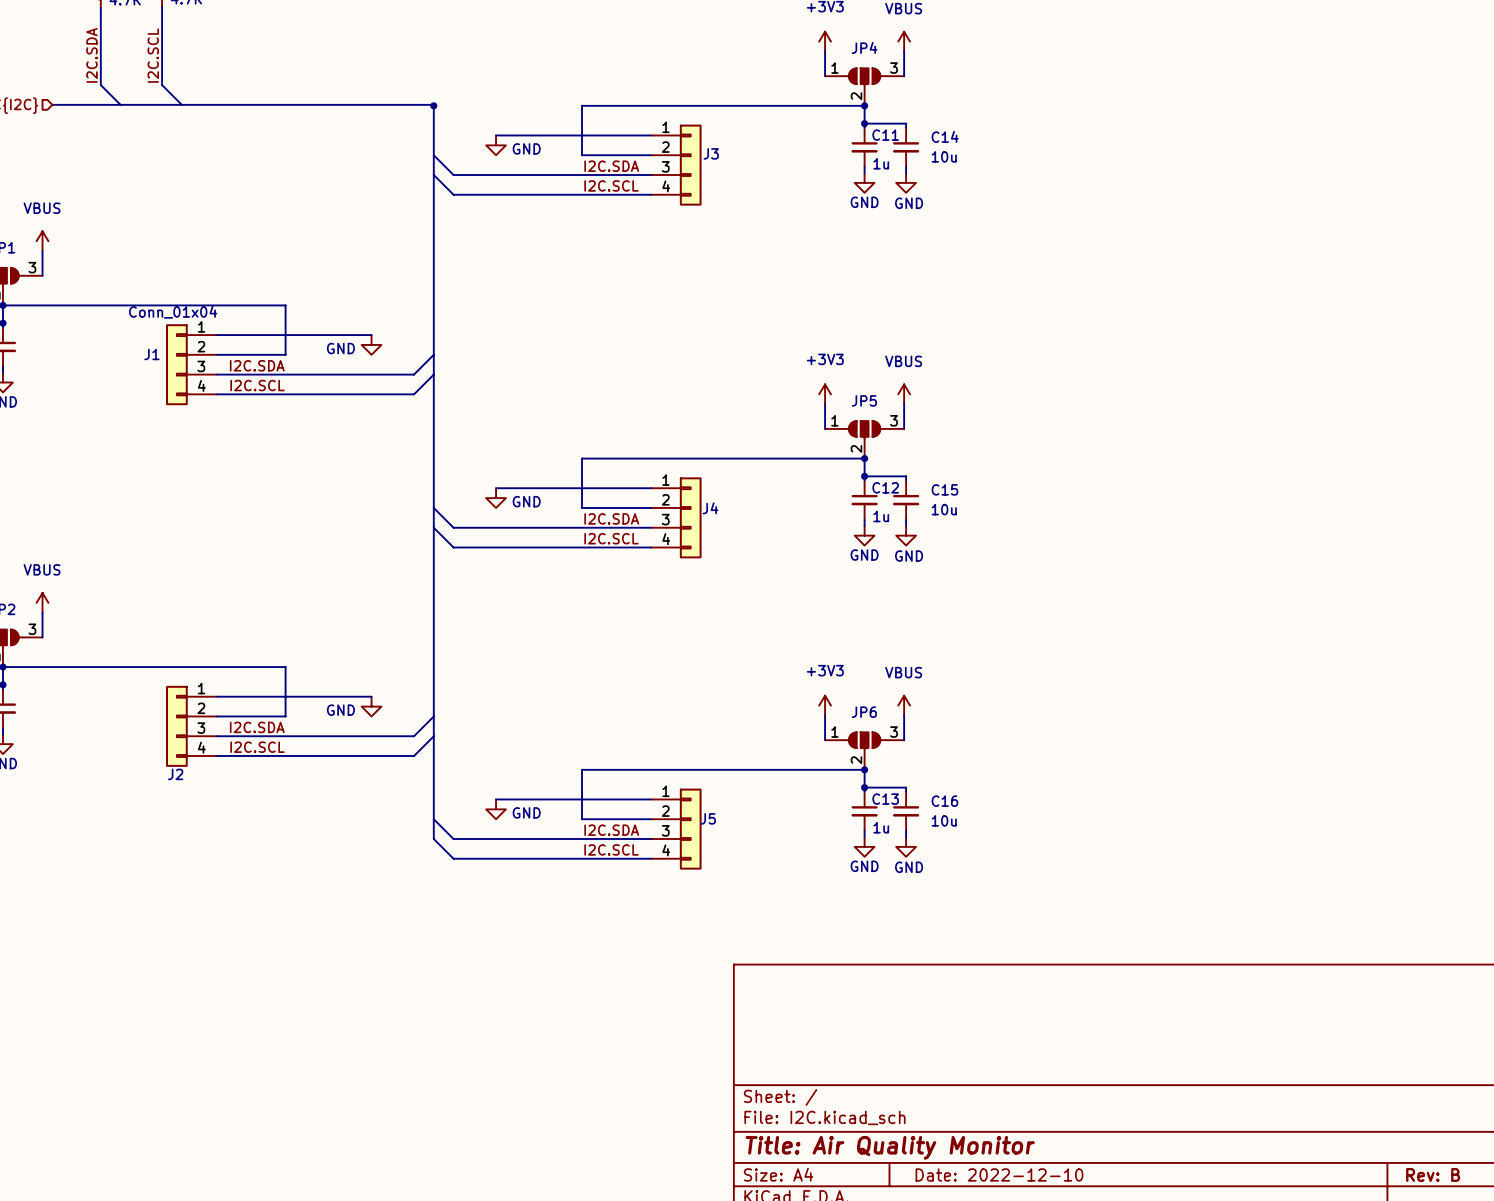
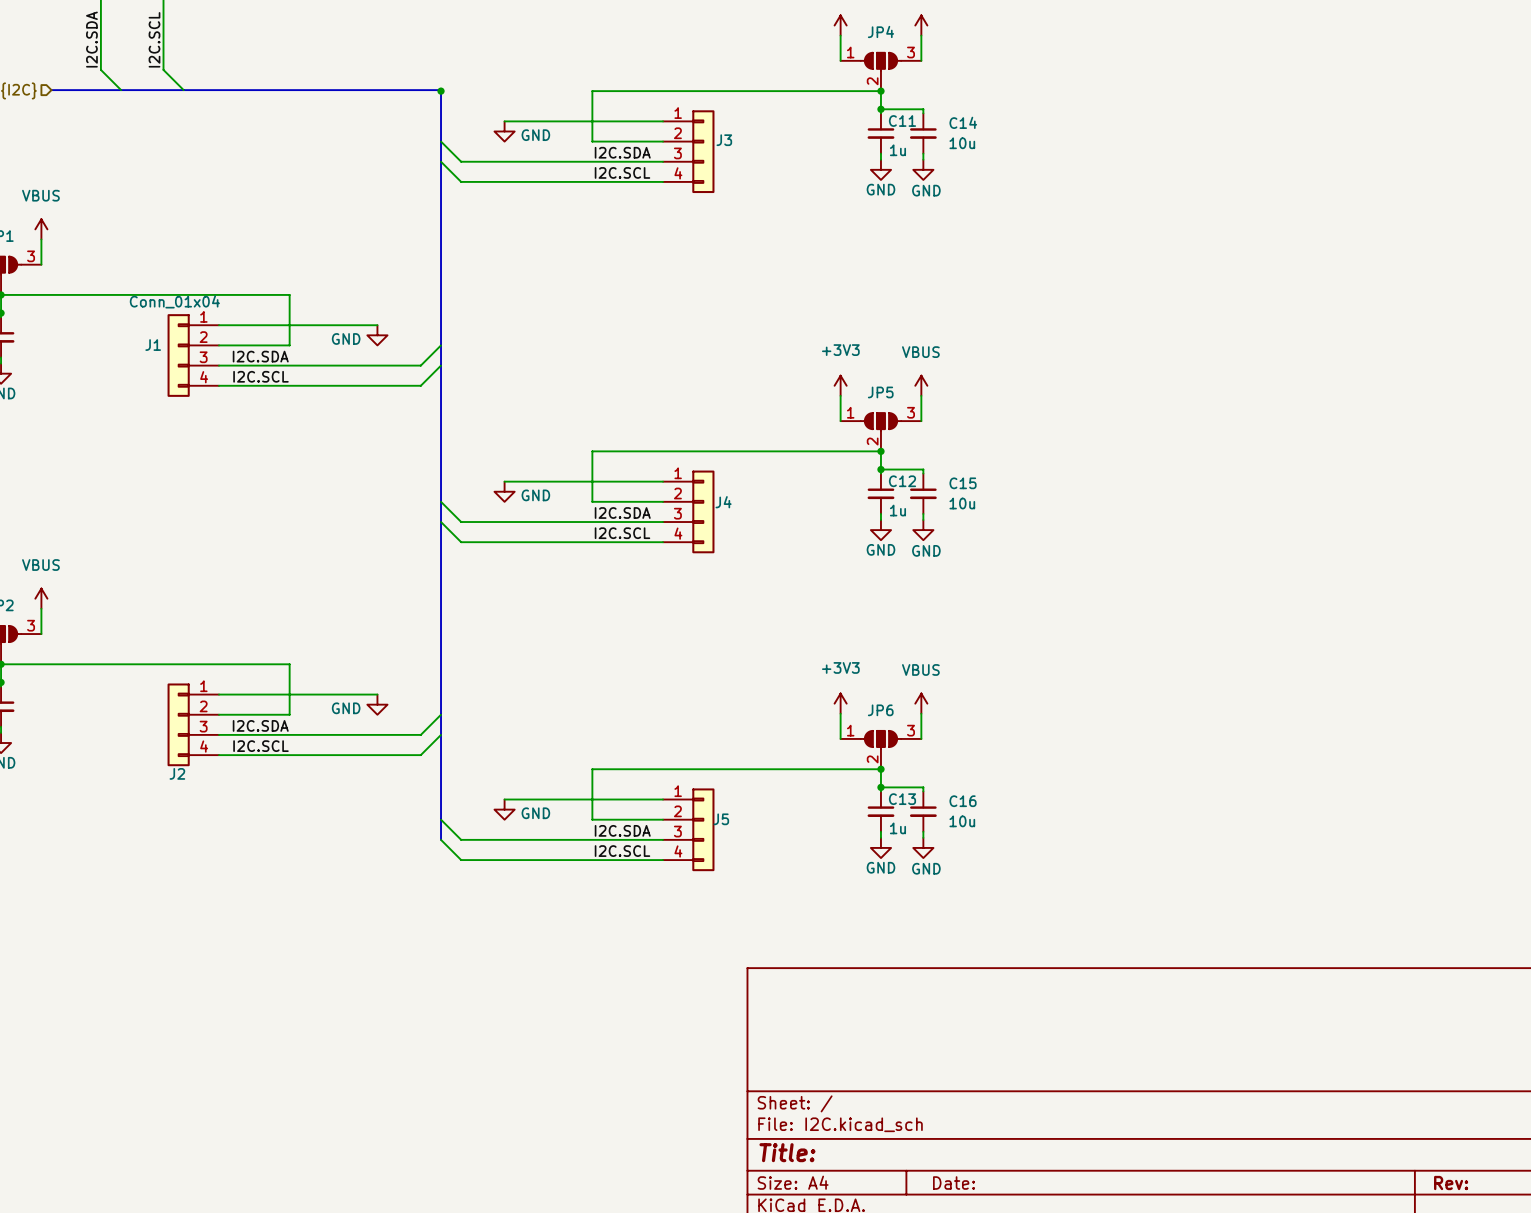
title block: Title: Air Quality Monitor (890, 1147) -> Title: (787, 1152)
title block: Date: 2022-12-10 (999, 1174) -> Date: (954, 1183)
title block: Rev: B (1433, 1174) -> Rev: (1451, 1183)

